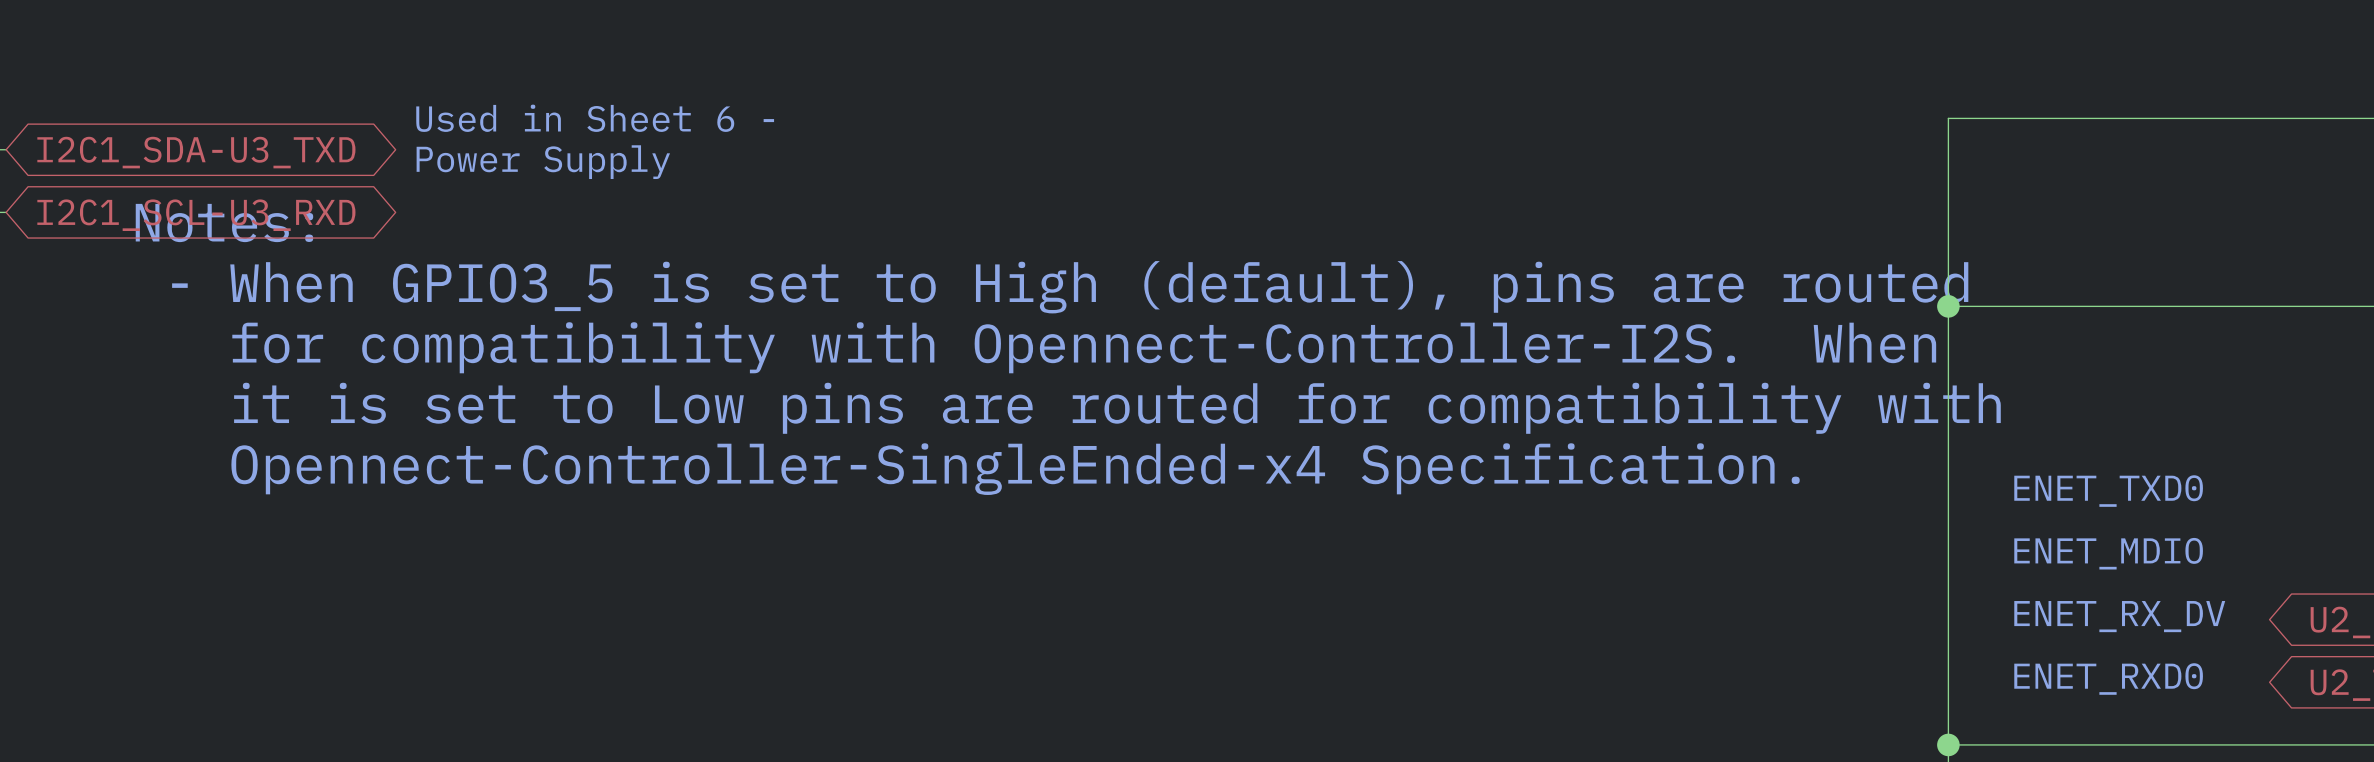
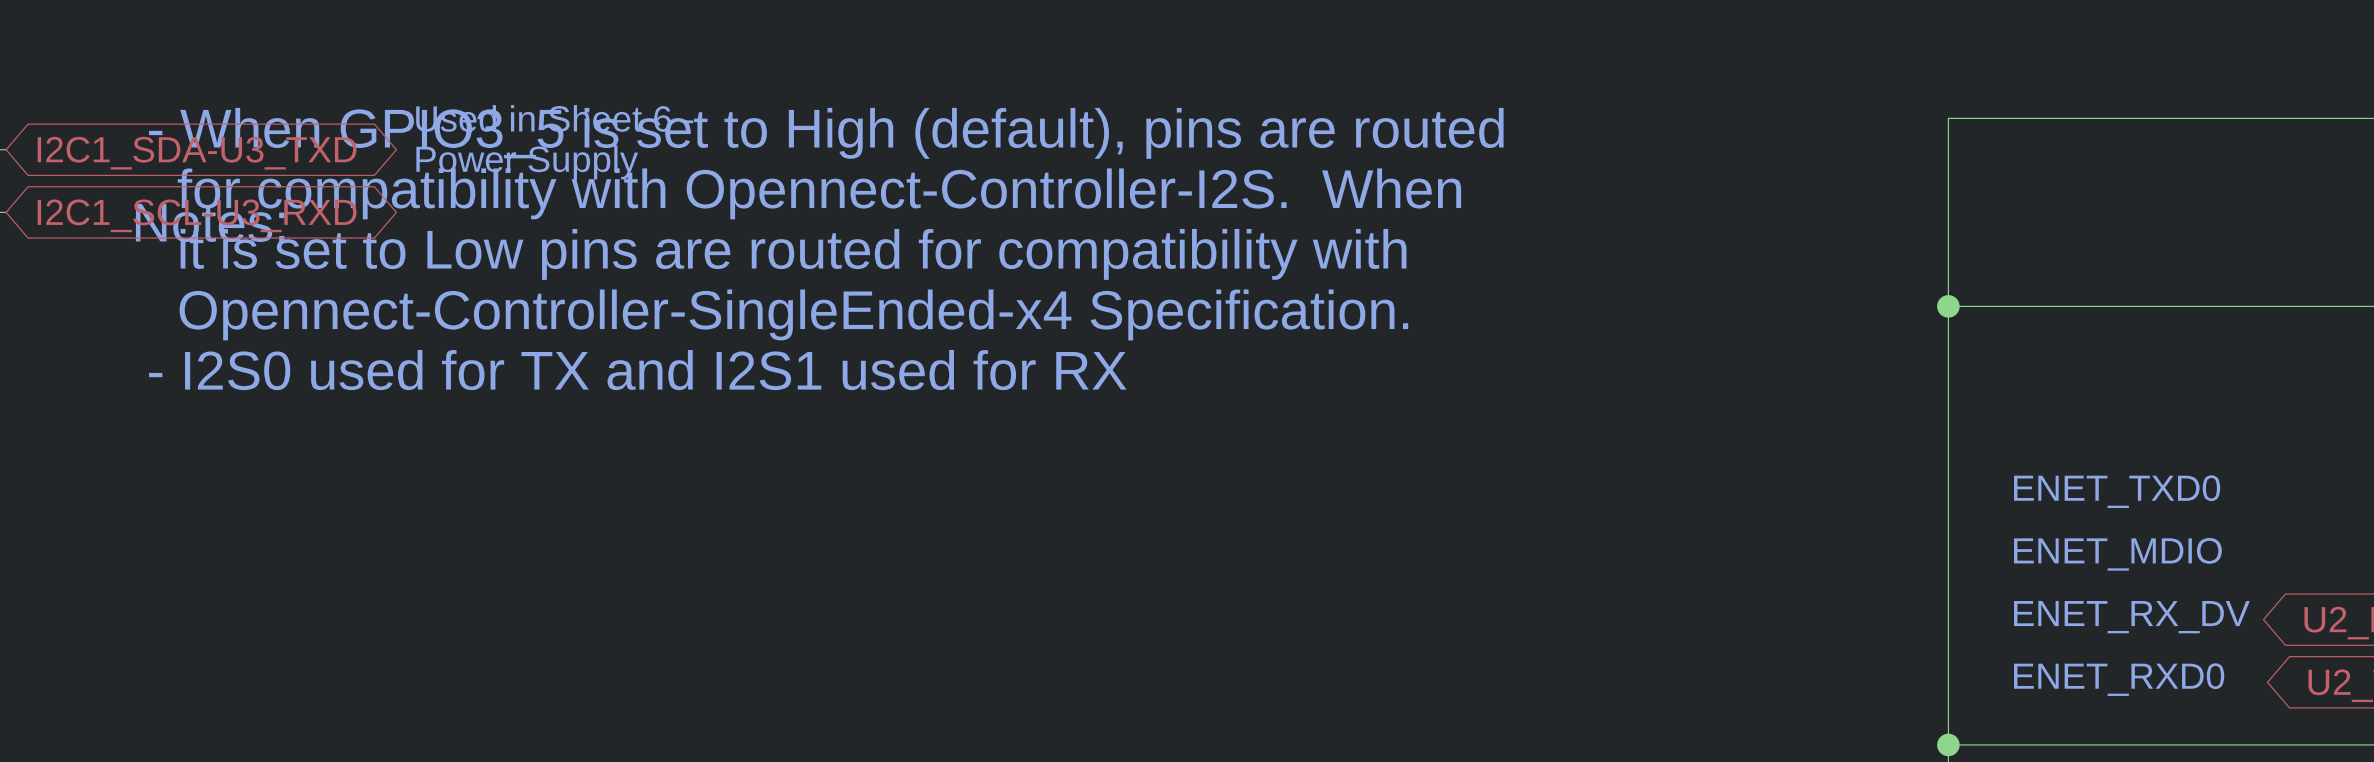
text position: - When GPIO3_5 is set to High (default), pins are routed (1070, 287) -> - When GPIO3_5 is set to High (default), pins are routed (826, 133)
text position: for compatibility with Opennect-Controller-I2S. When (1084, 347) -> for compatibility with Opennect-Controller-I2S. When (819, 193)
text: none -> - I2S0 used for TX and I2S1 used for RX (637, 370)
text position: it is set to Low pins are routed for compatibility with (1117, 408) -> it is set to Low pins are routed for compatibility with (793, 254)
text position: Opennect-Controller-SingleEnded-x4 Specification. (1015, 469) -> Opennect-Controller-SingleEnded-x4 Specification. (793, 314)

